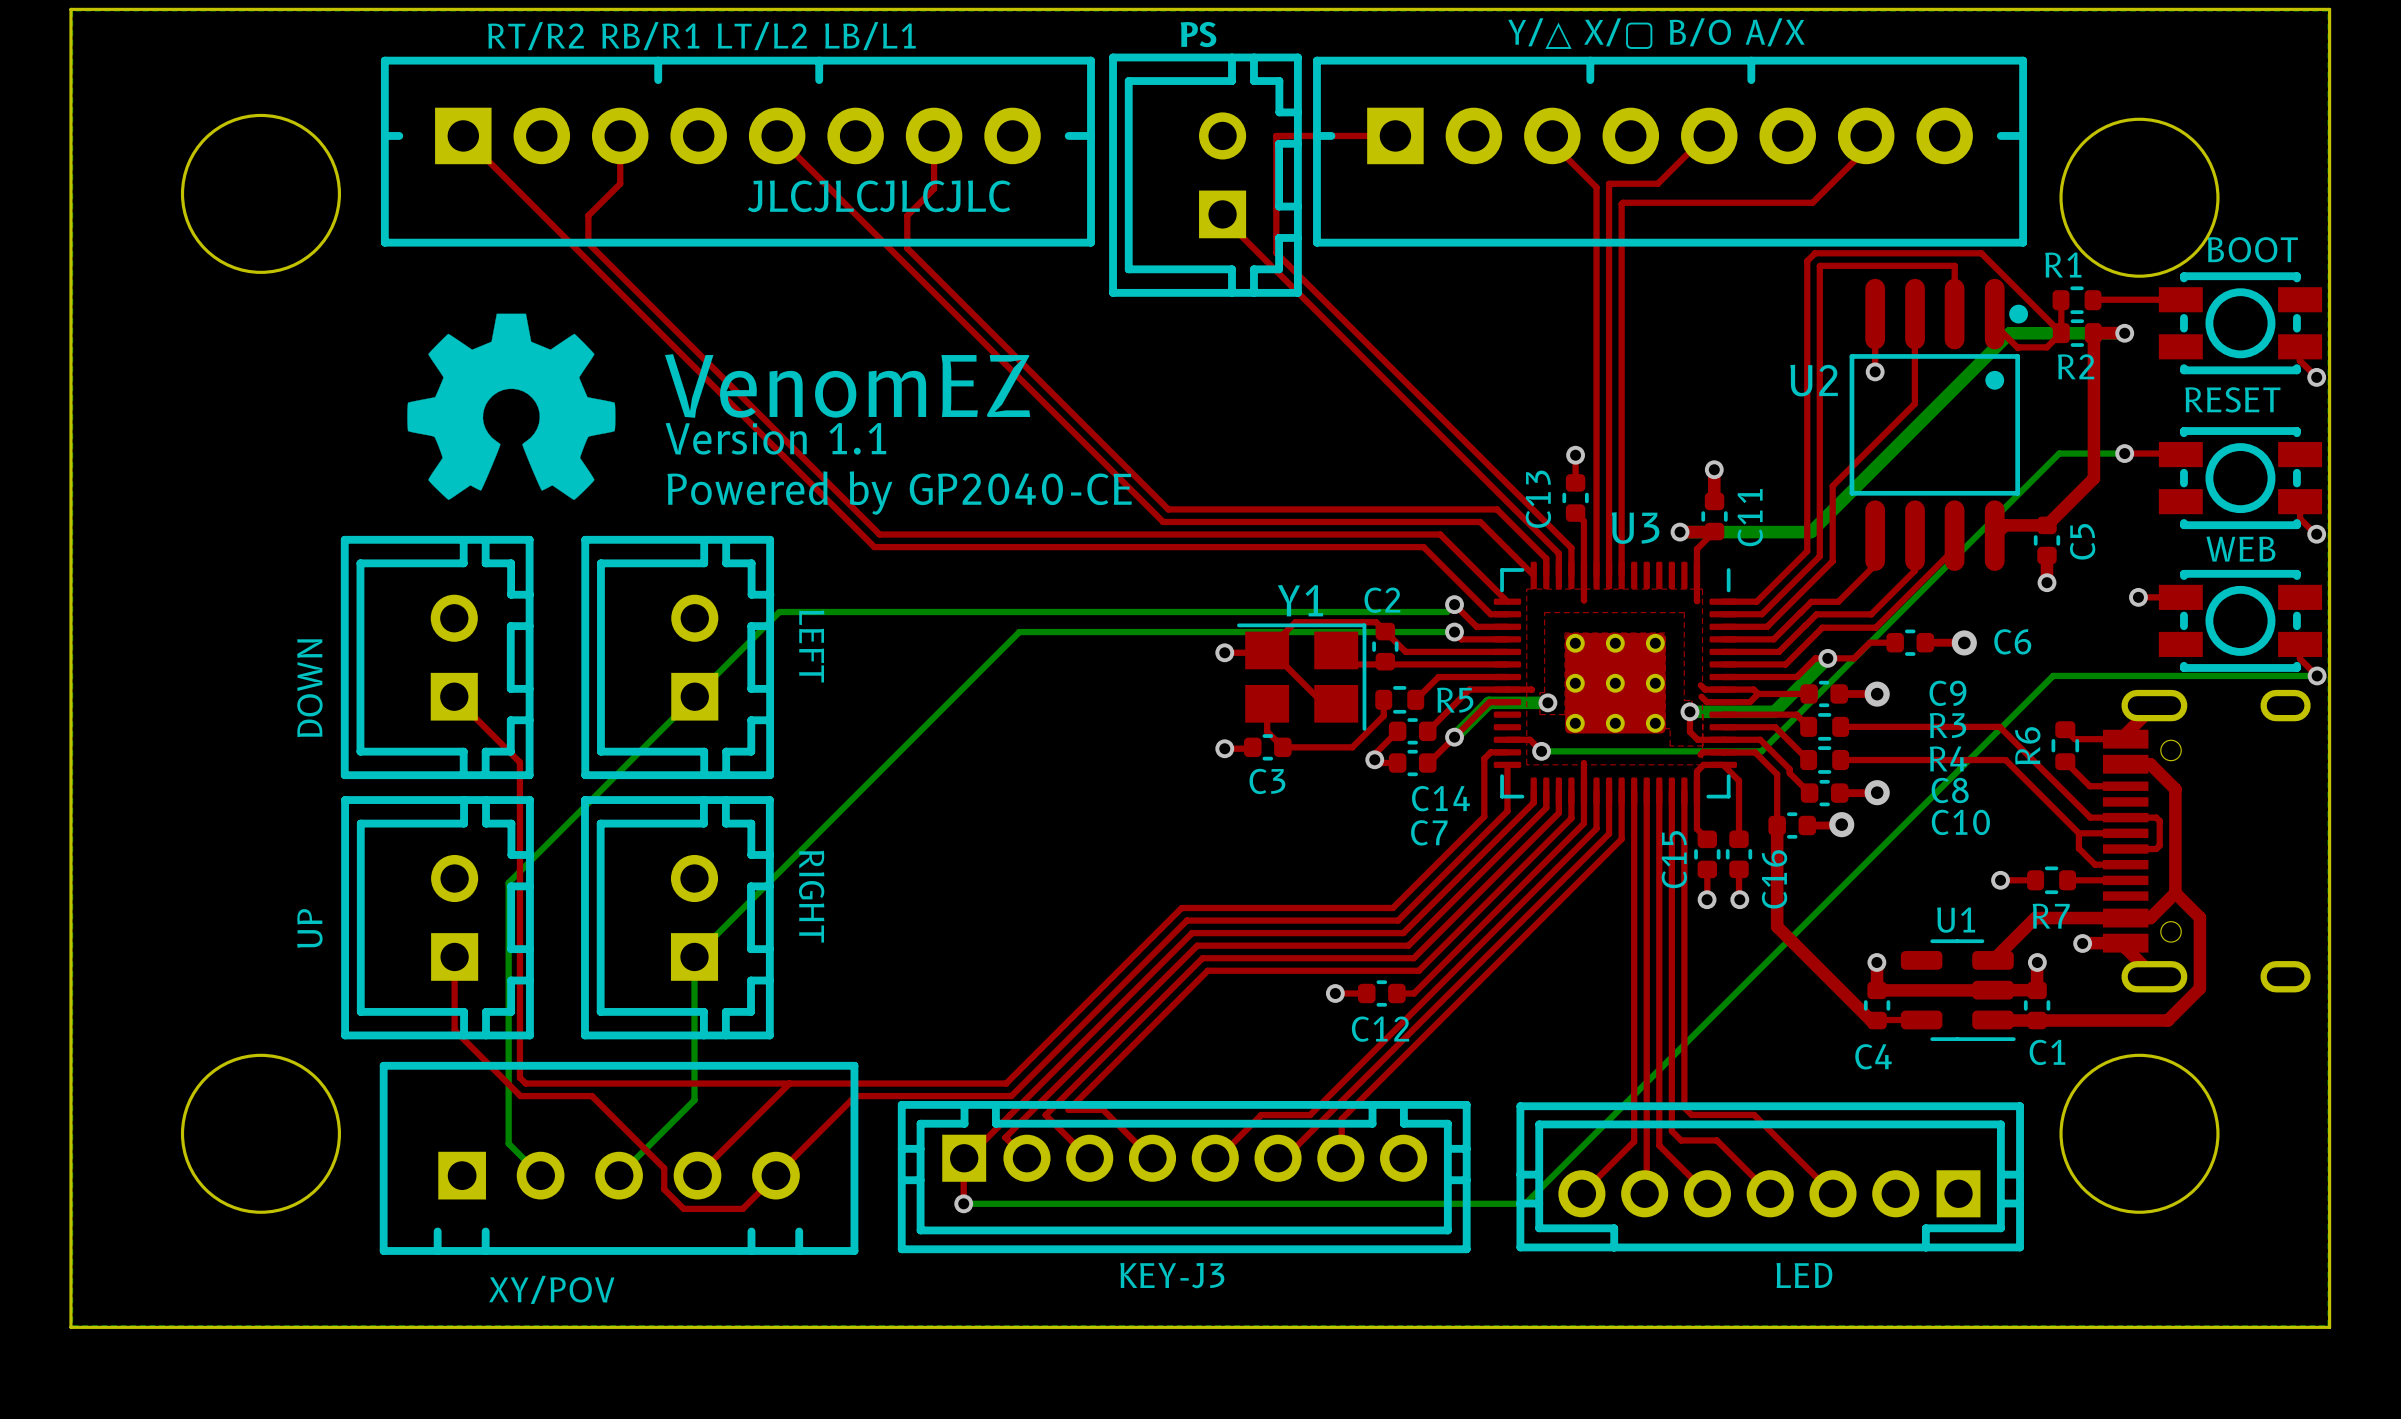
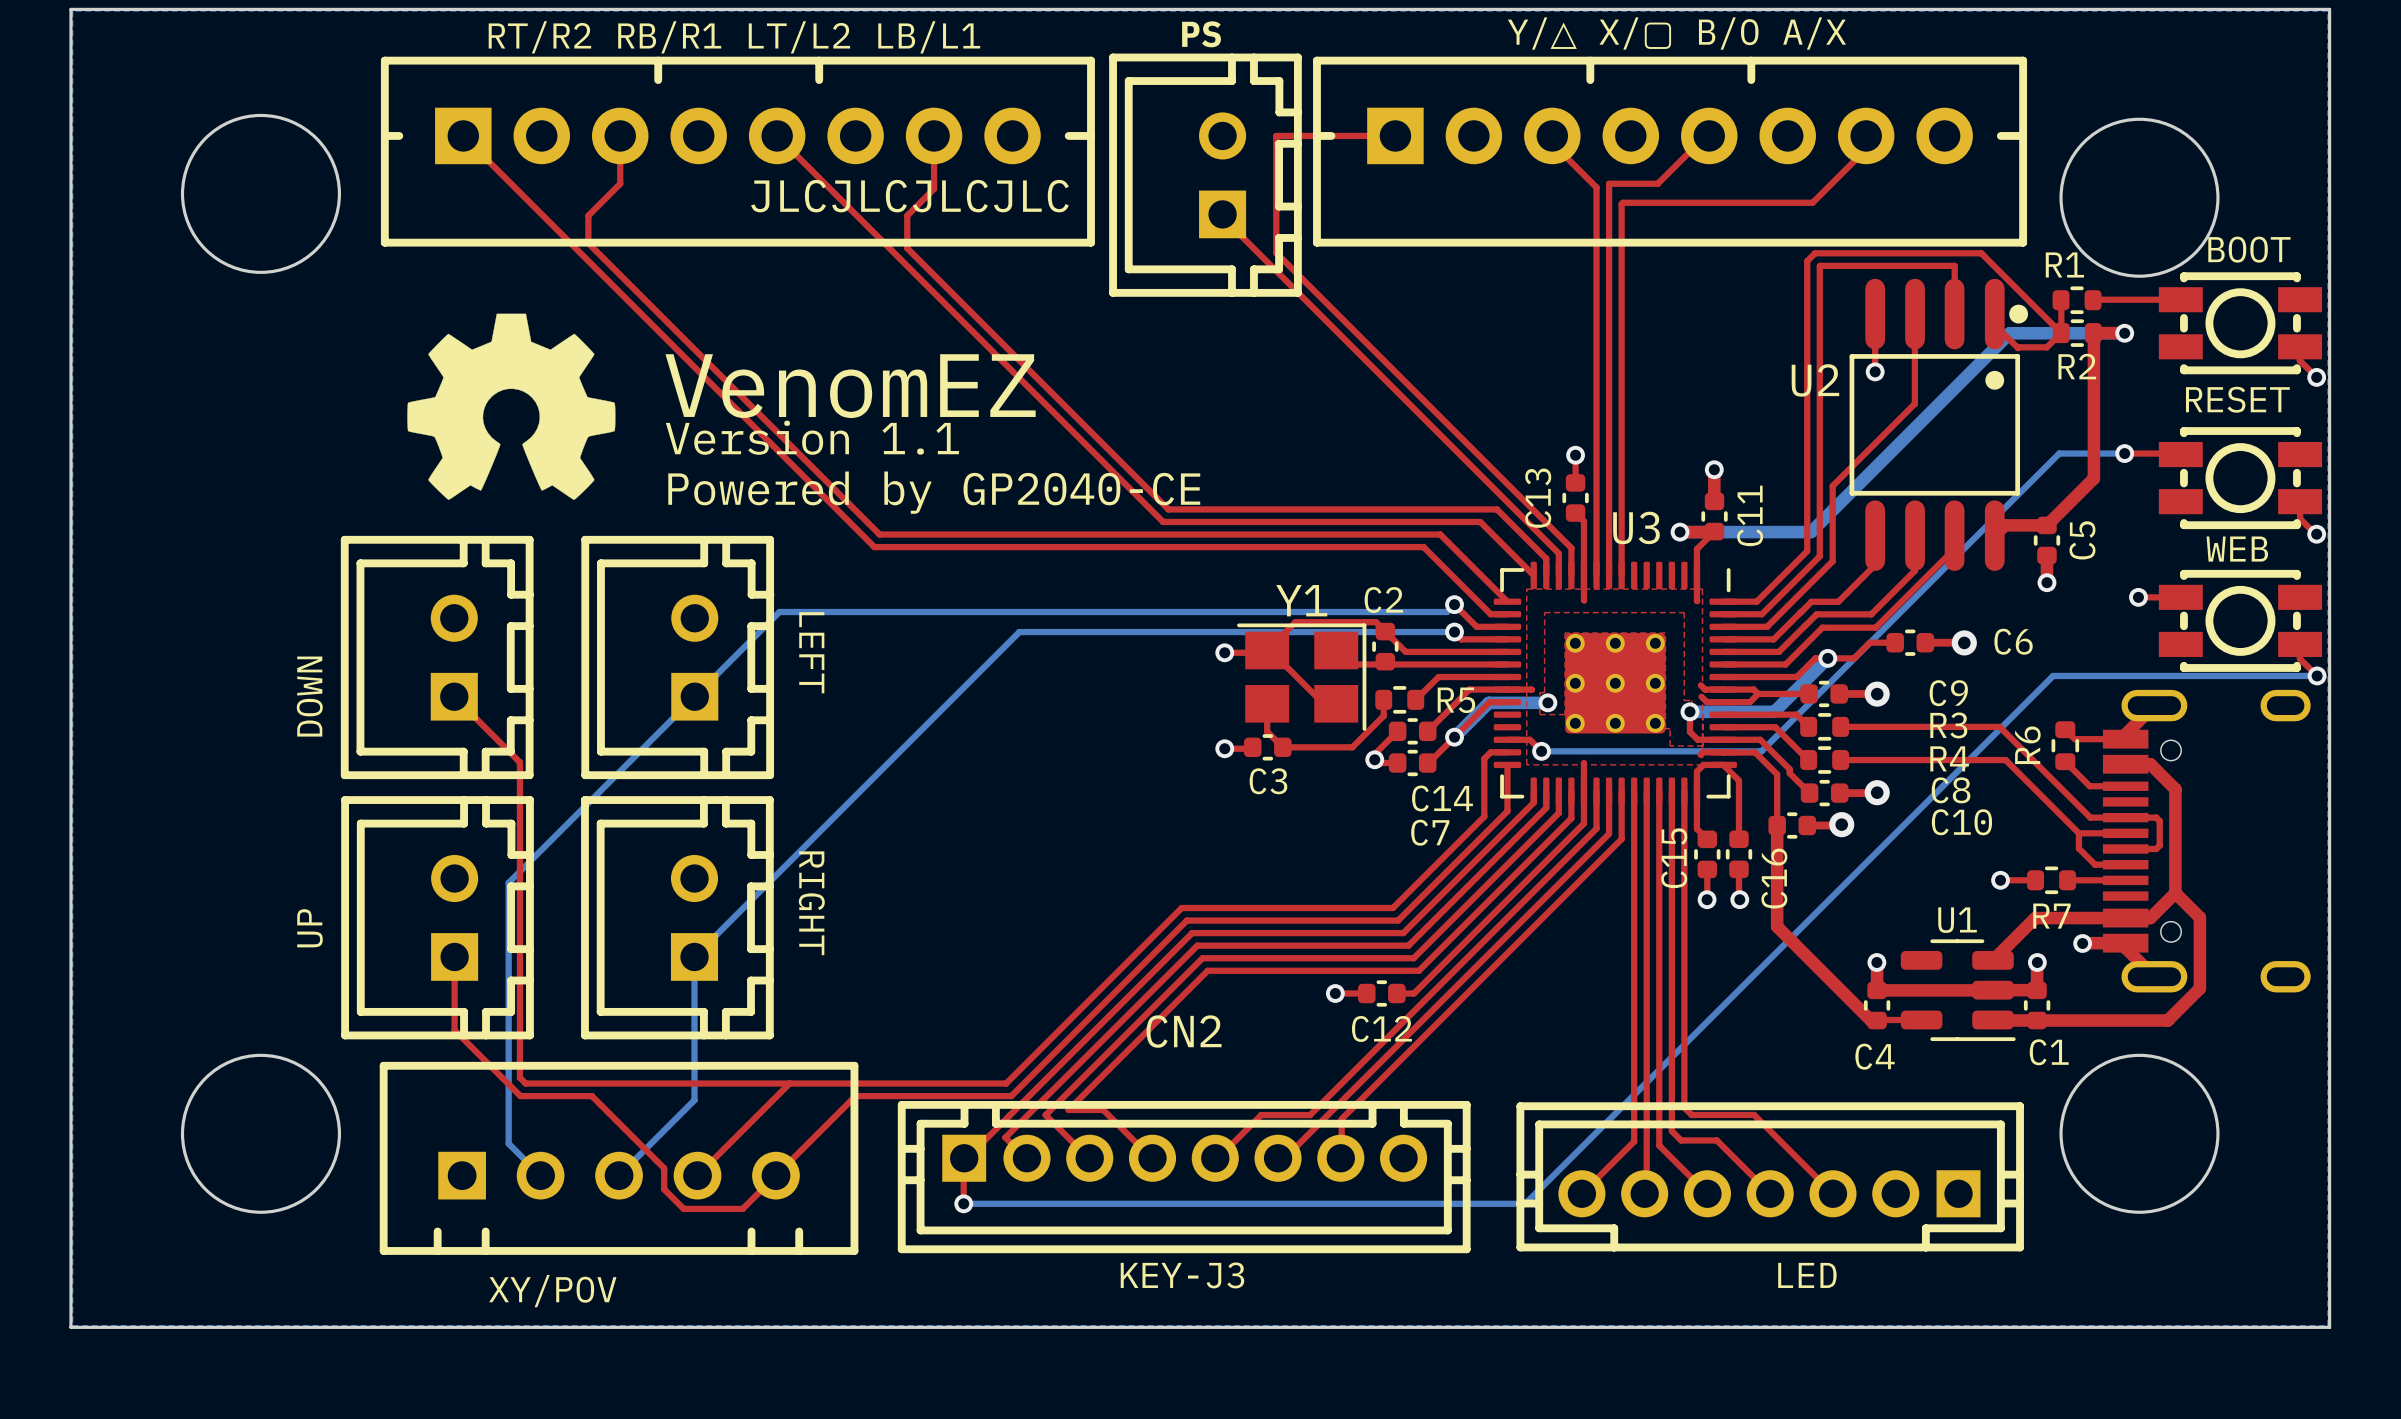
CN2 name: none -> CN2 (1184, 1031)

